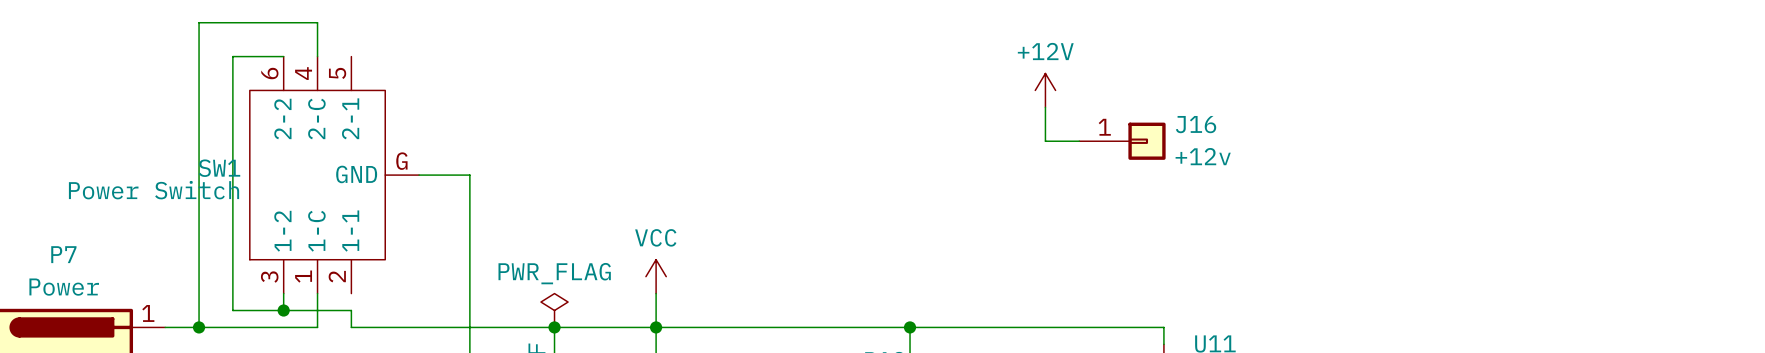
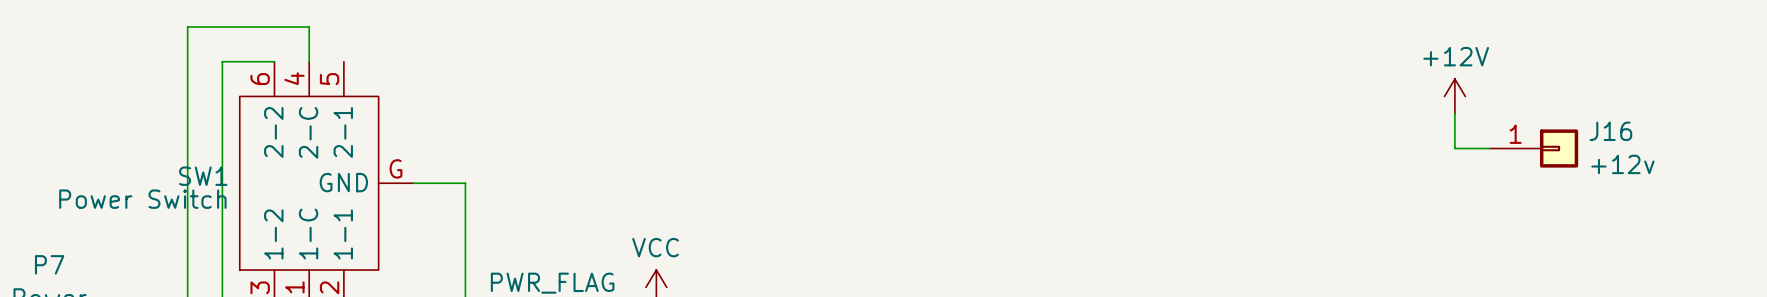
power symbol: +12V (1045, 90) -> none
power symbol: none -> +12V (1454, 96)
wire: (1045, 107) (1045, 141) (1079, 141) -> none
wire: none -> (1454, 113) (1454, 148) (1489, 148)
J16 position: (1122, 141) -> (1533, 148)

